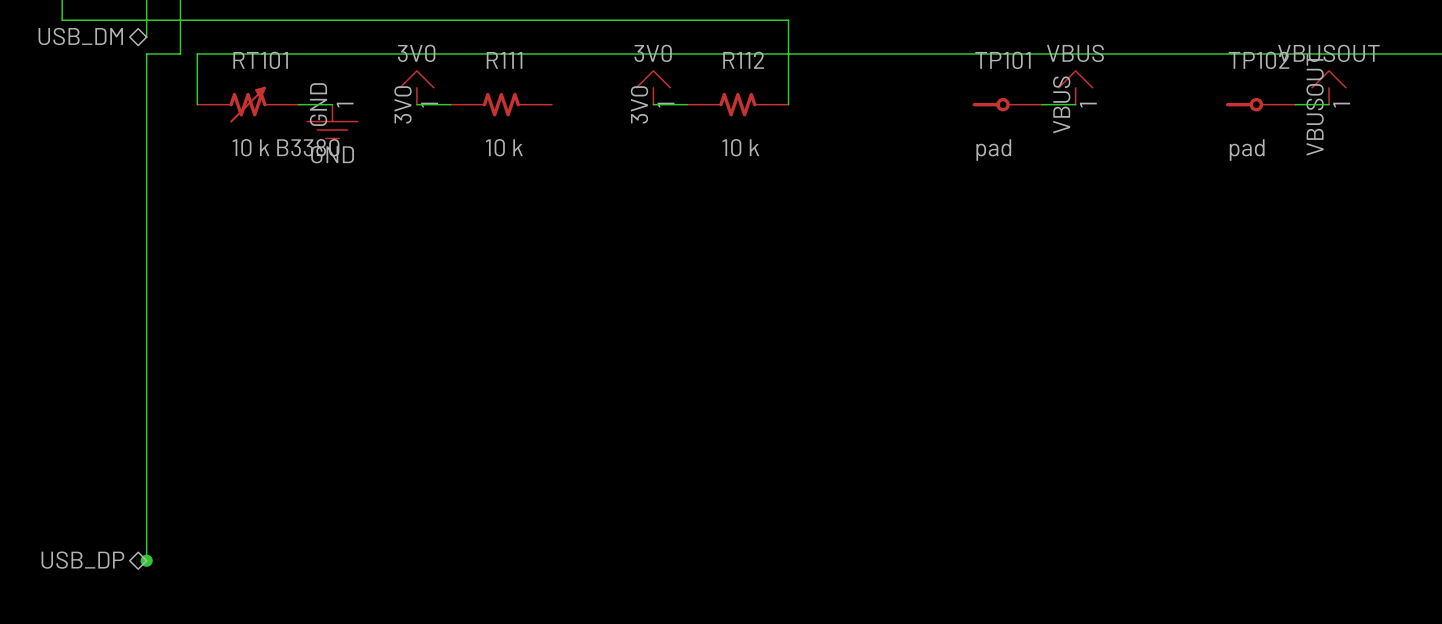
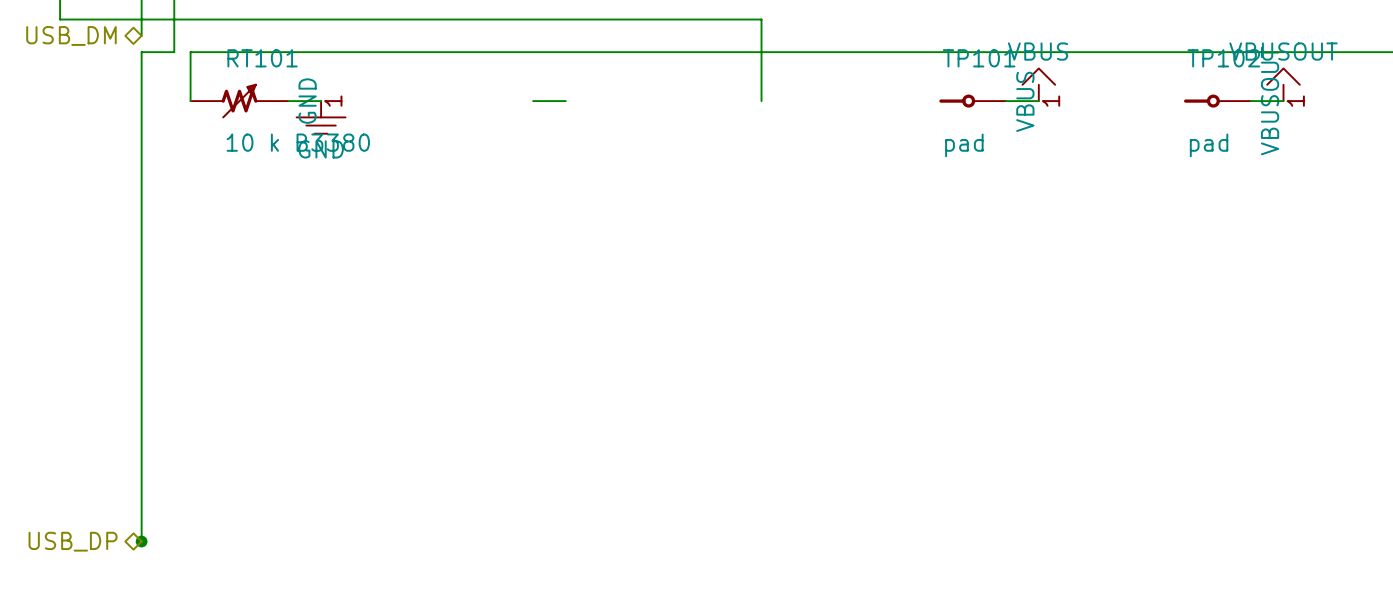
power symbol: 3V0 (416, 87) -> none
power symbol: 3V0 (653, 87) -> none
wire: (416, 104) (450, 104) -> none
R111: 10 k (501, 104) -> none
wire: (653, 104) (687, 104) -> (533, 101) (565, 101)
R112: 10 k (737, 104) -> none

